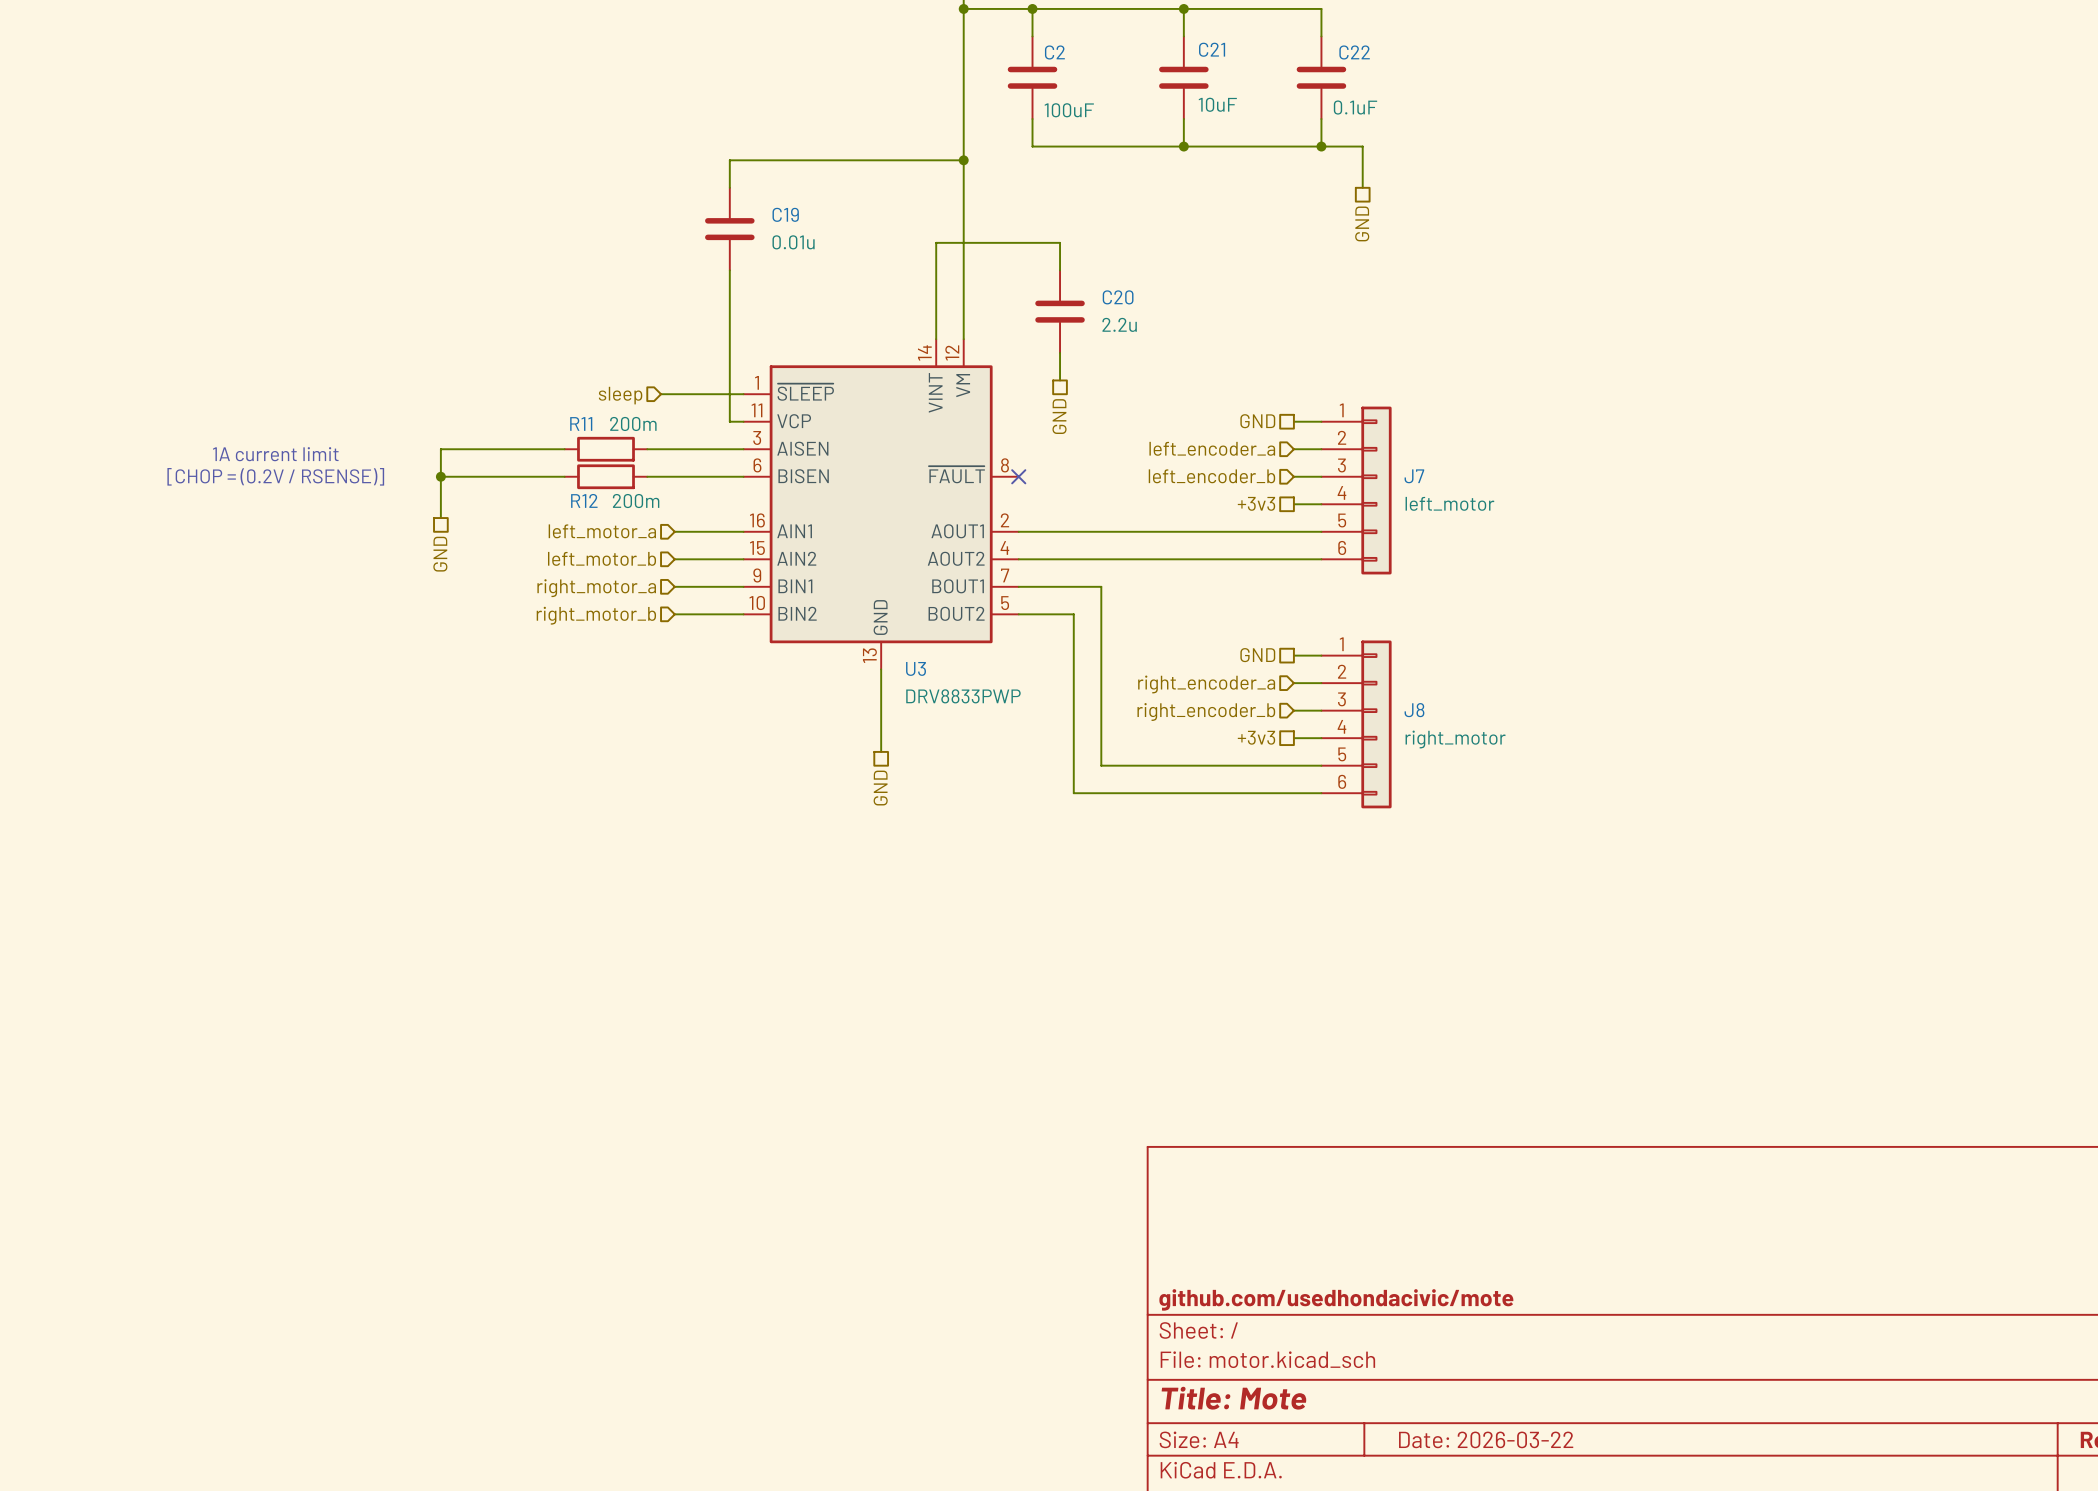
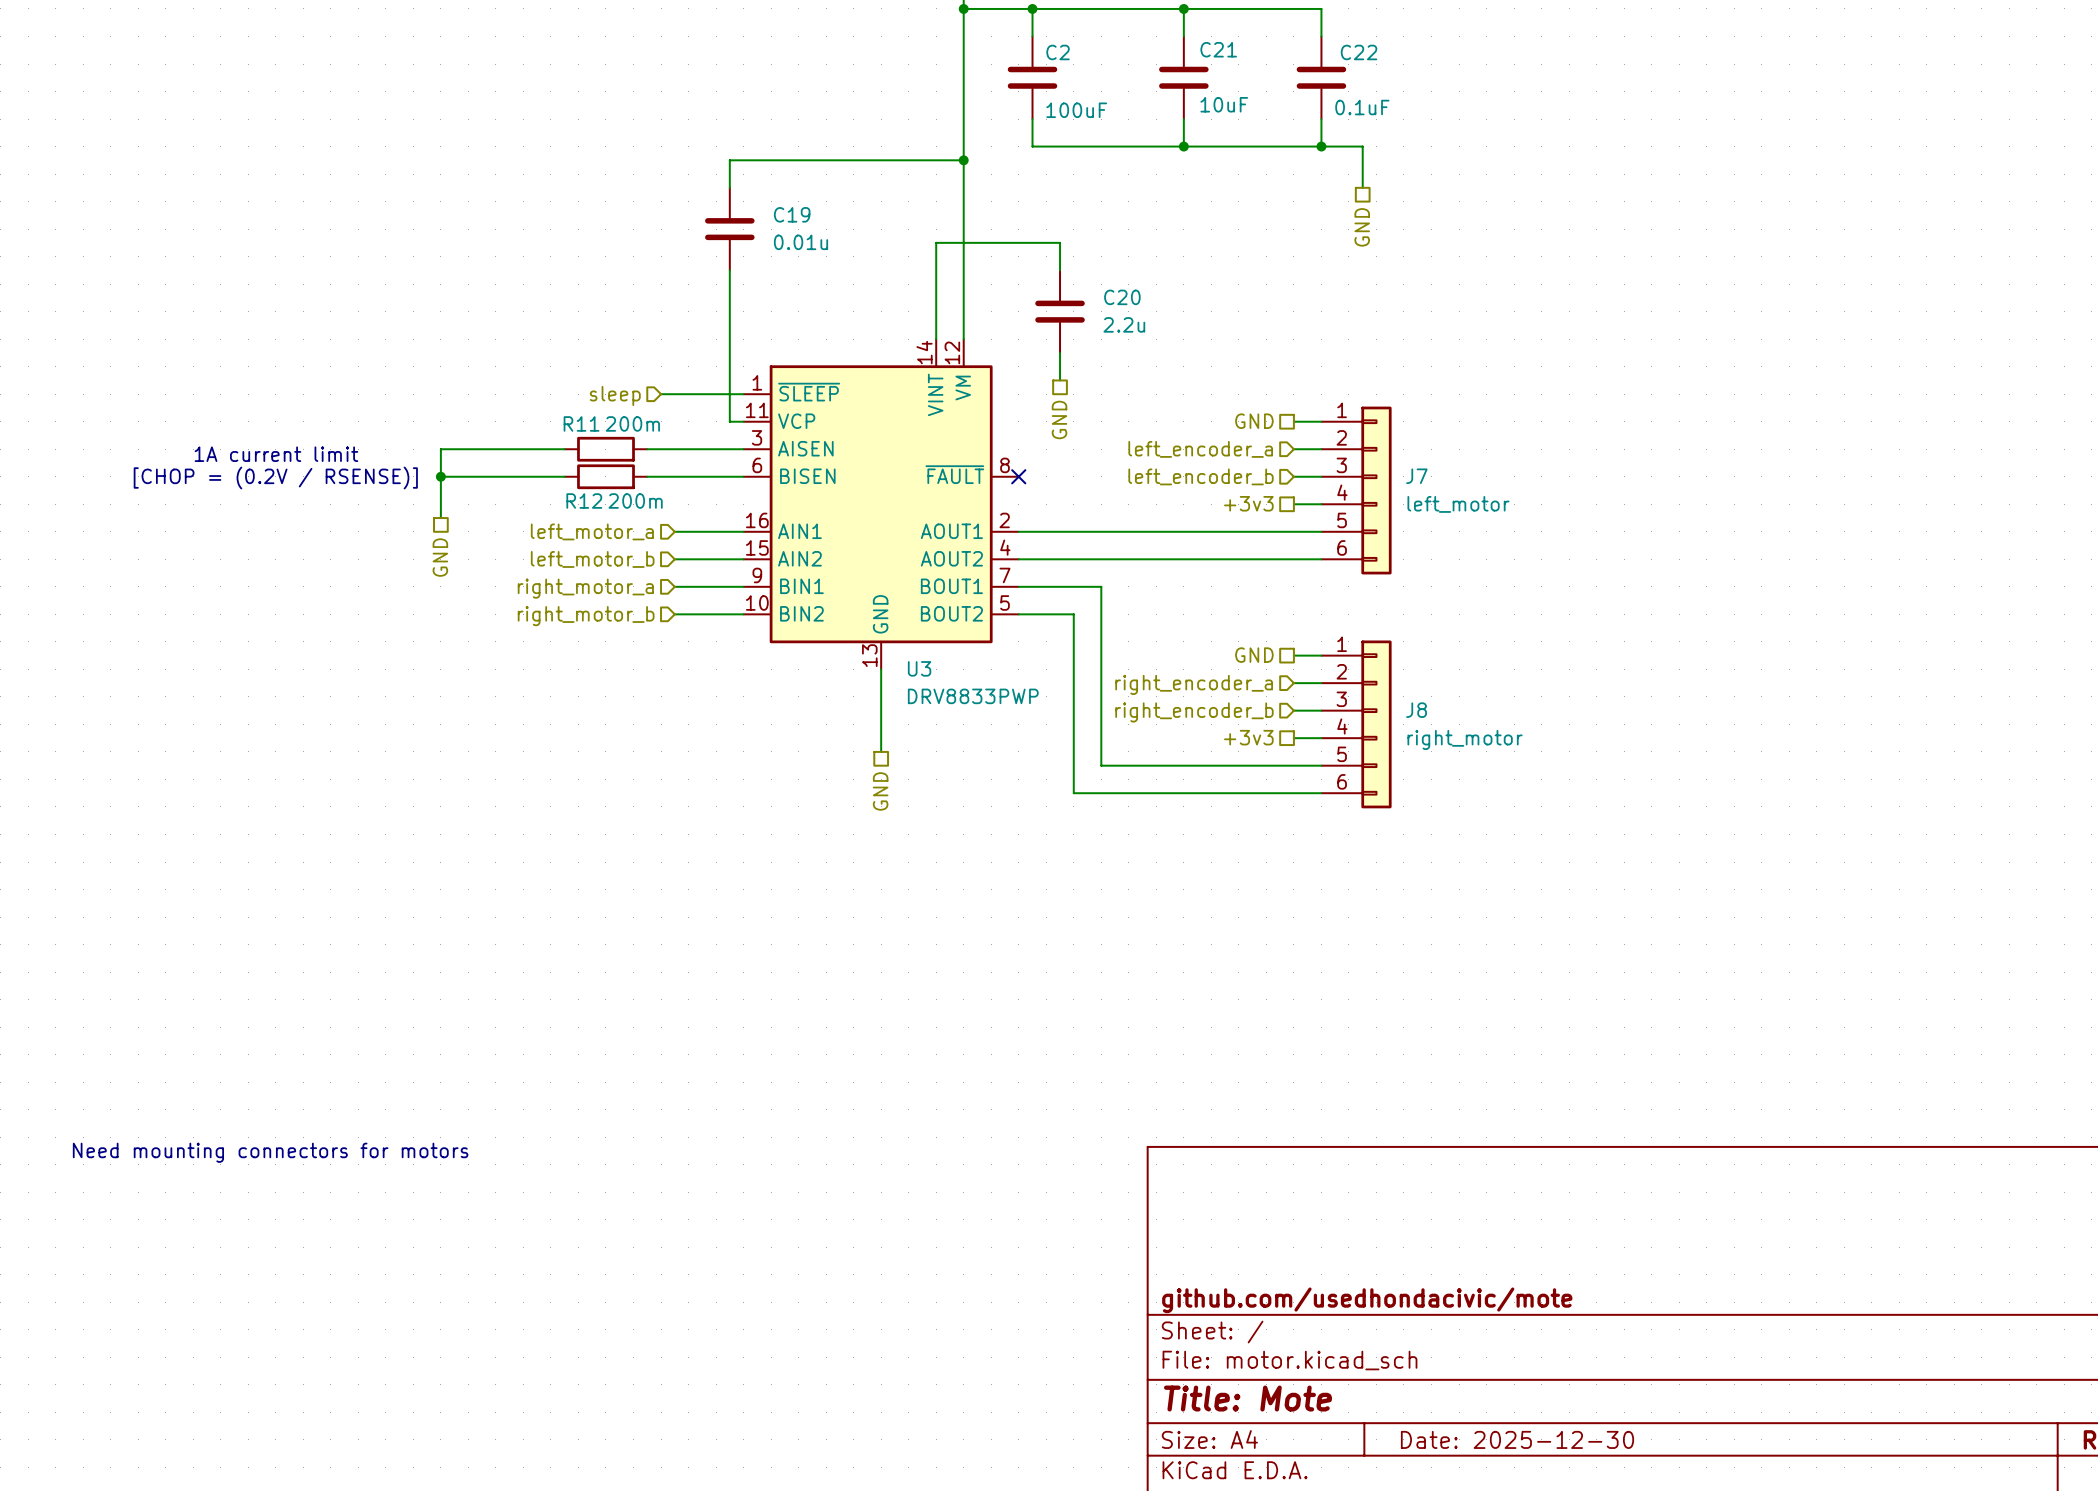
text: none -> Need mounting connectors for motors (270, 1152)
title block: Date: 2026-03-22 (1486, 1439) -> Date: 2025-12-30 (1517, 1439)

